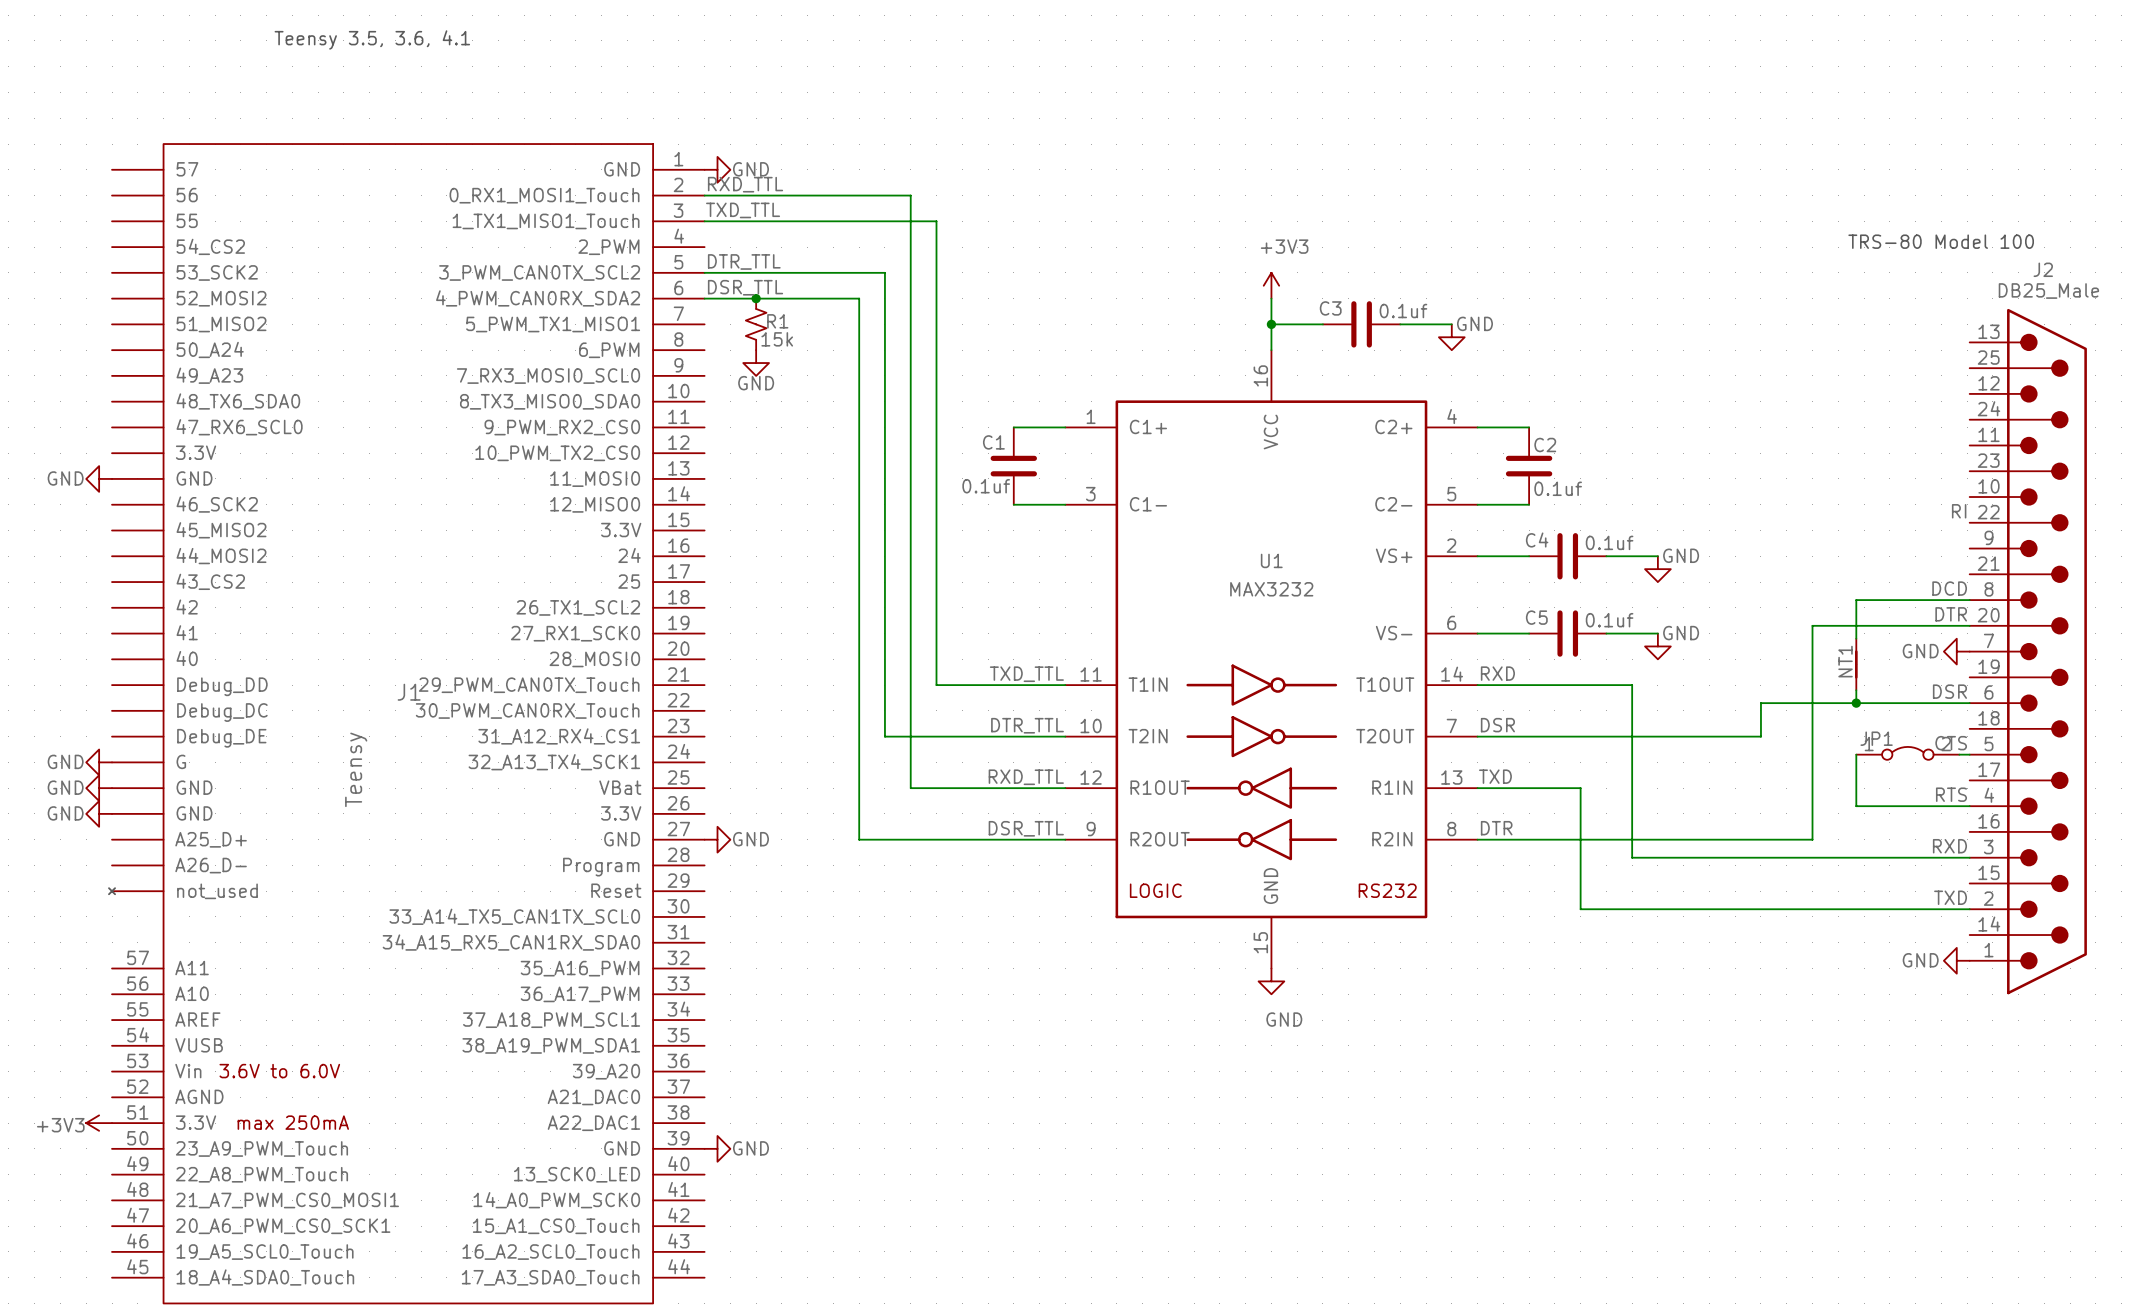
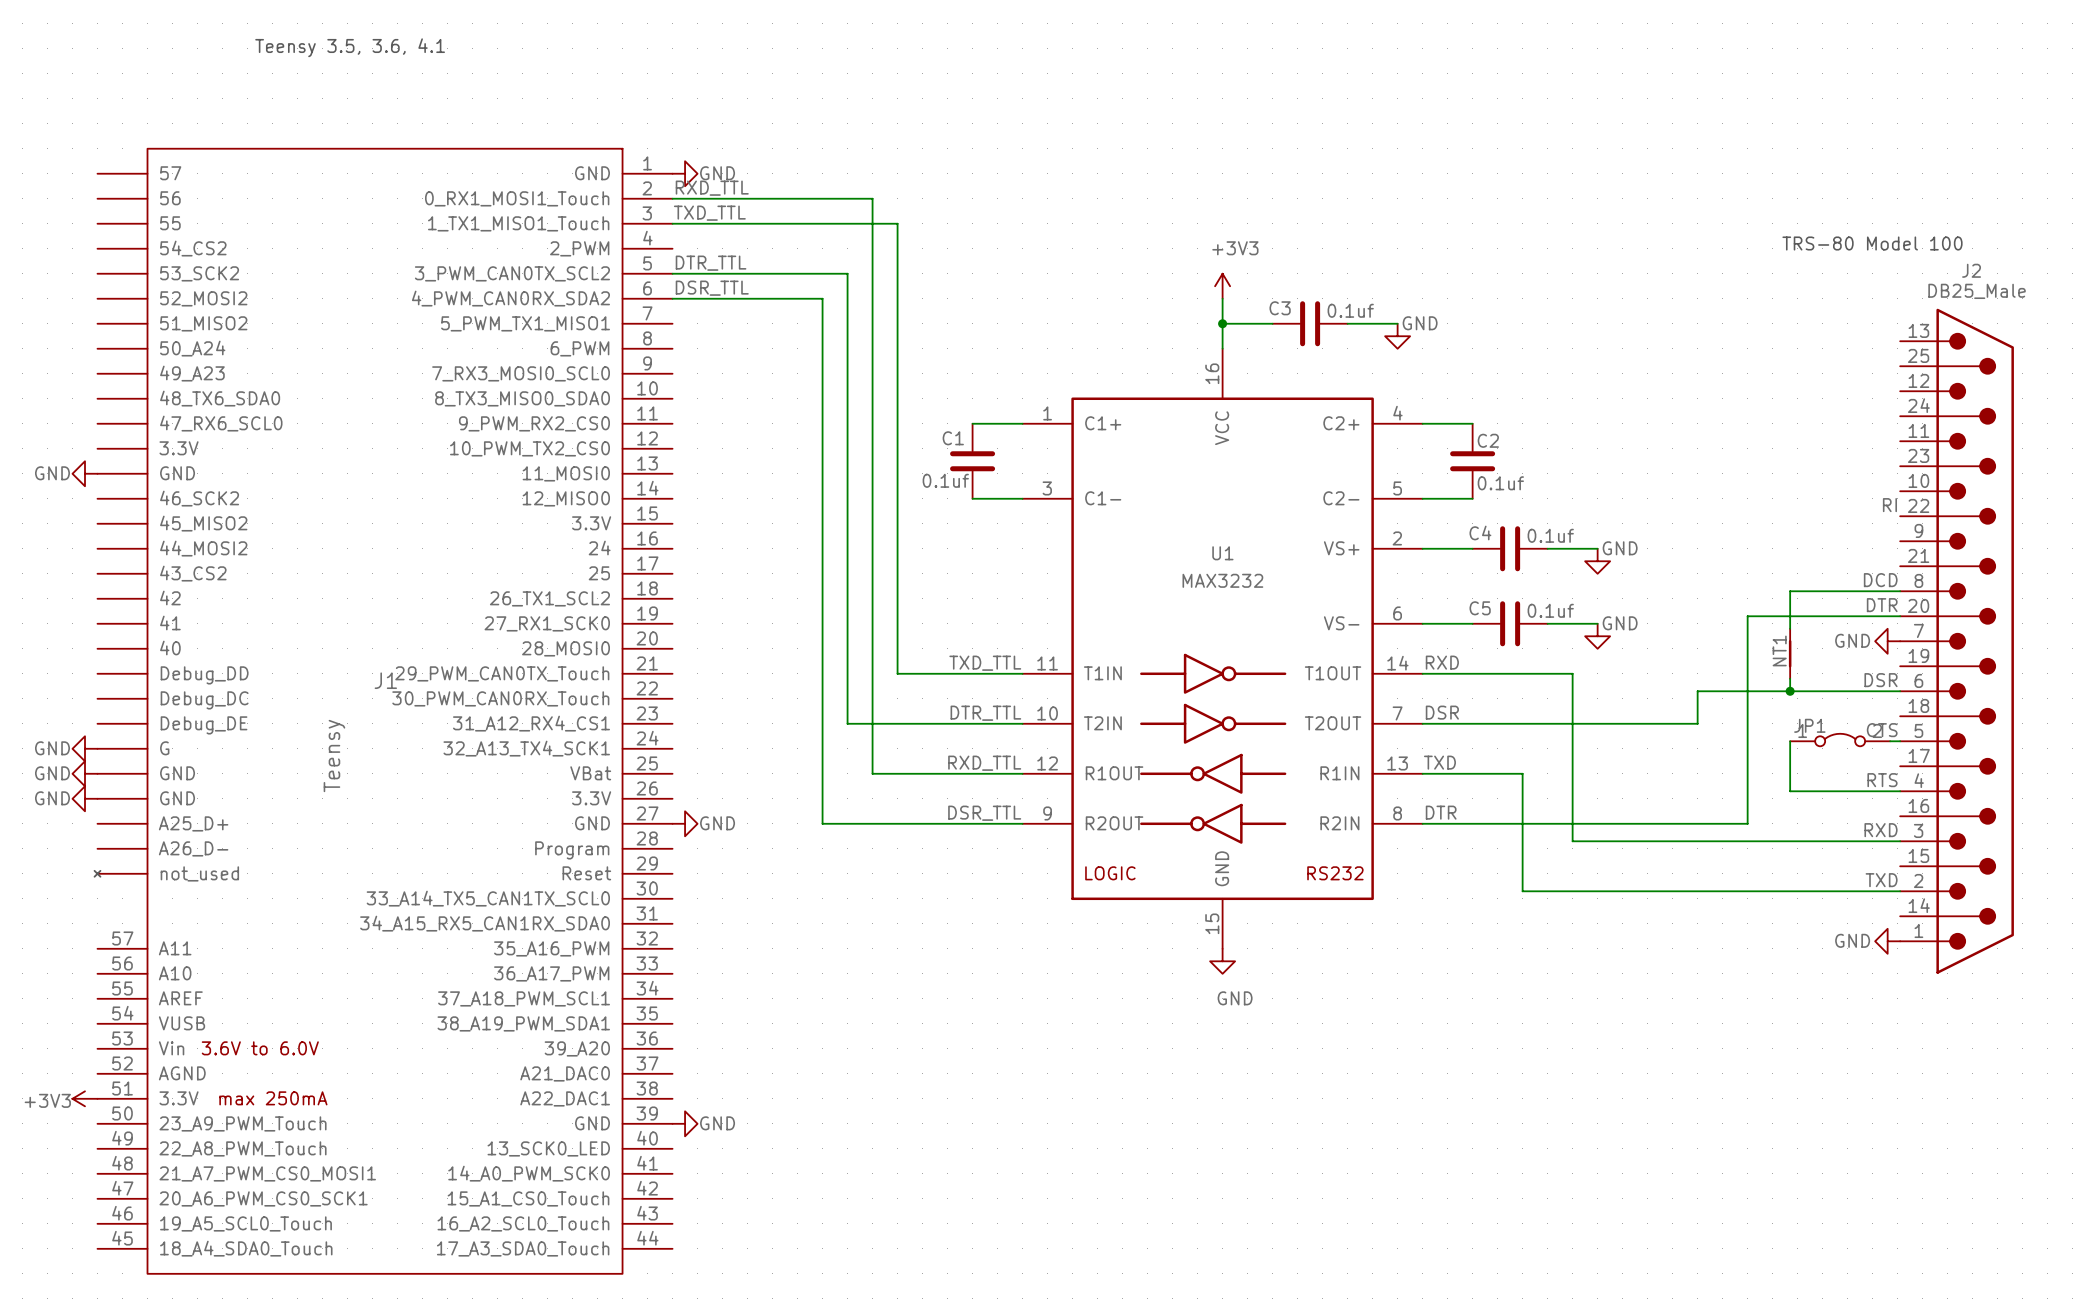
junction: (756, 298) -> none
R1: 15k (756, 324) -> none
power symbol: GND (756, 363) -> none

